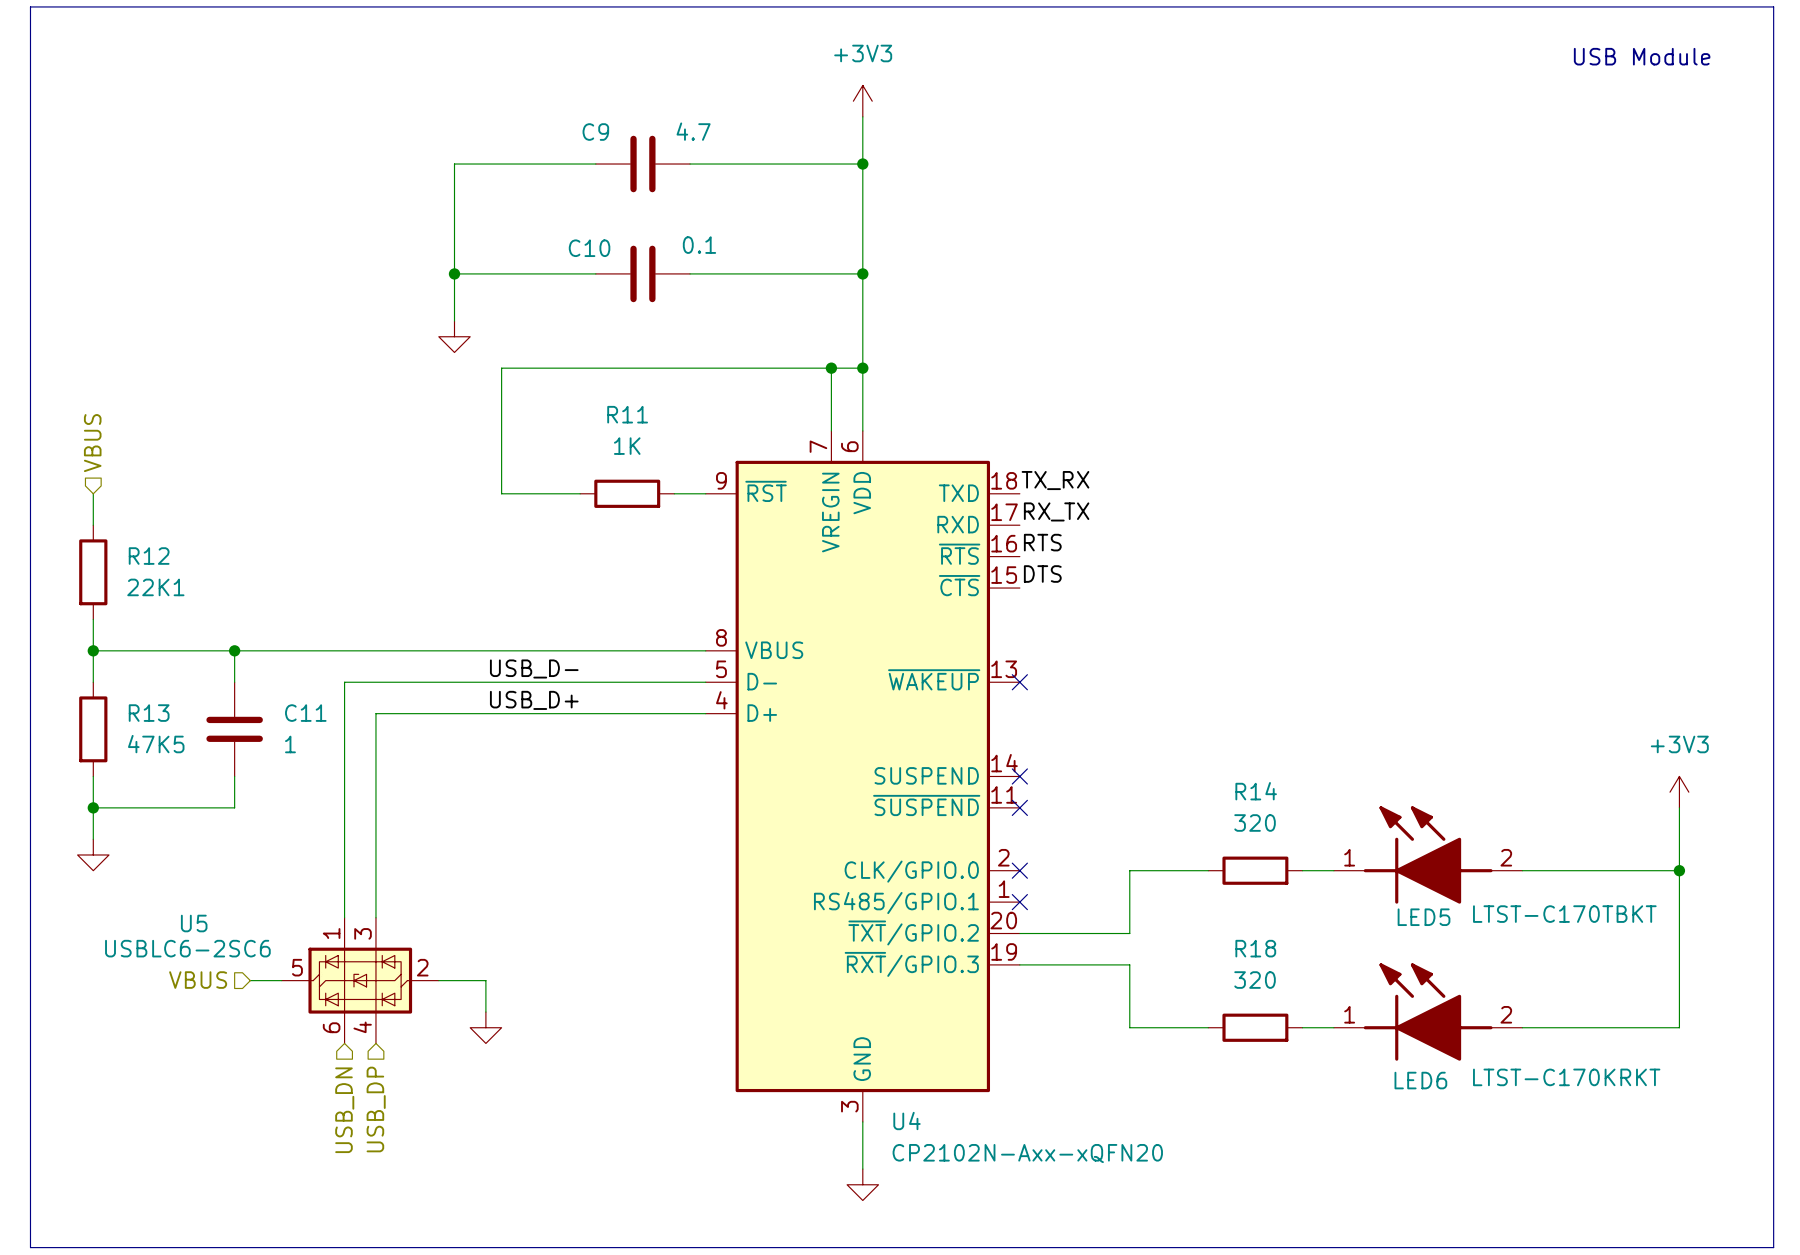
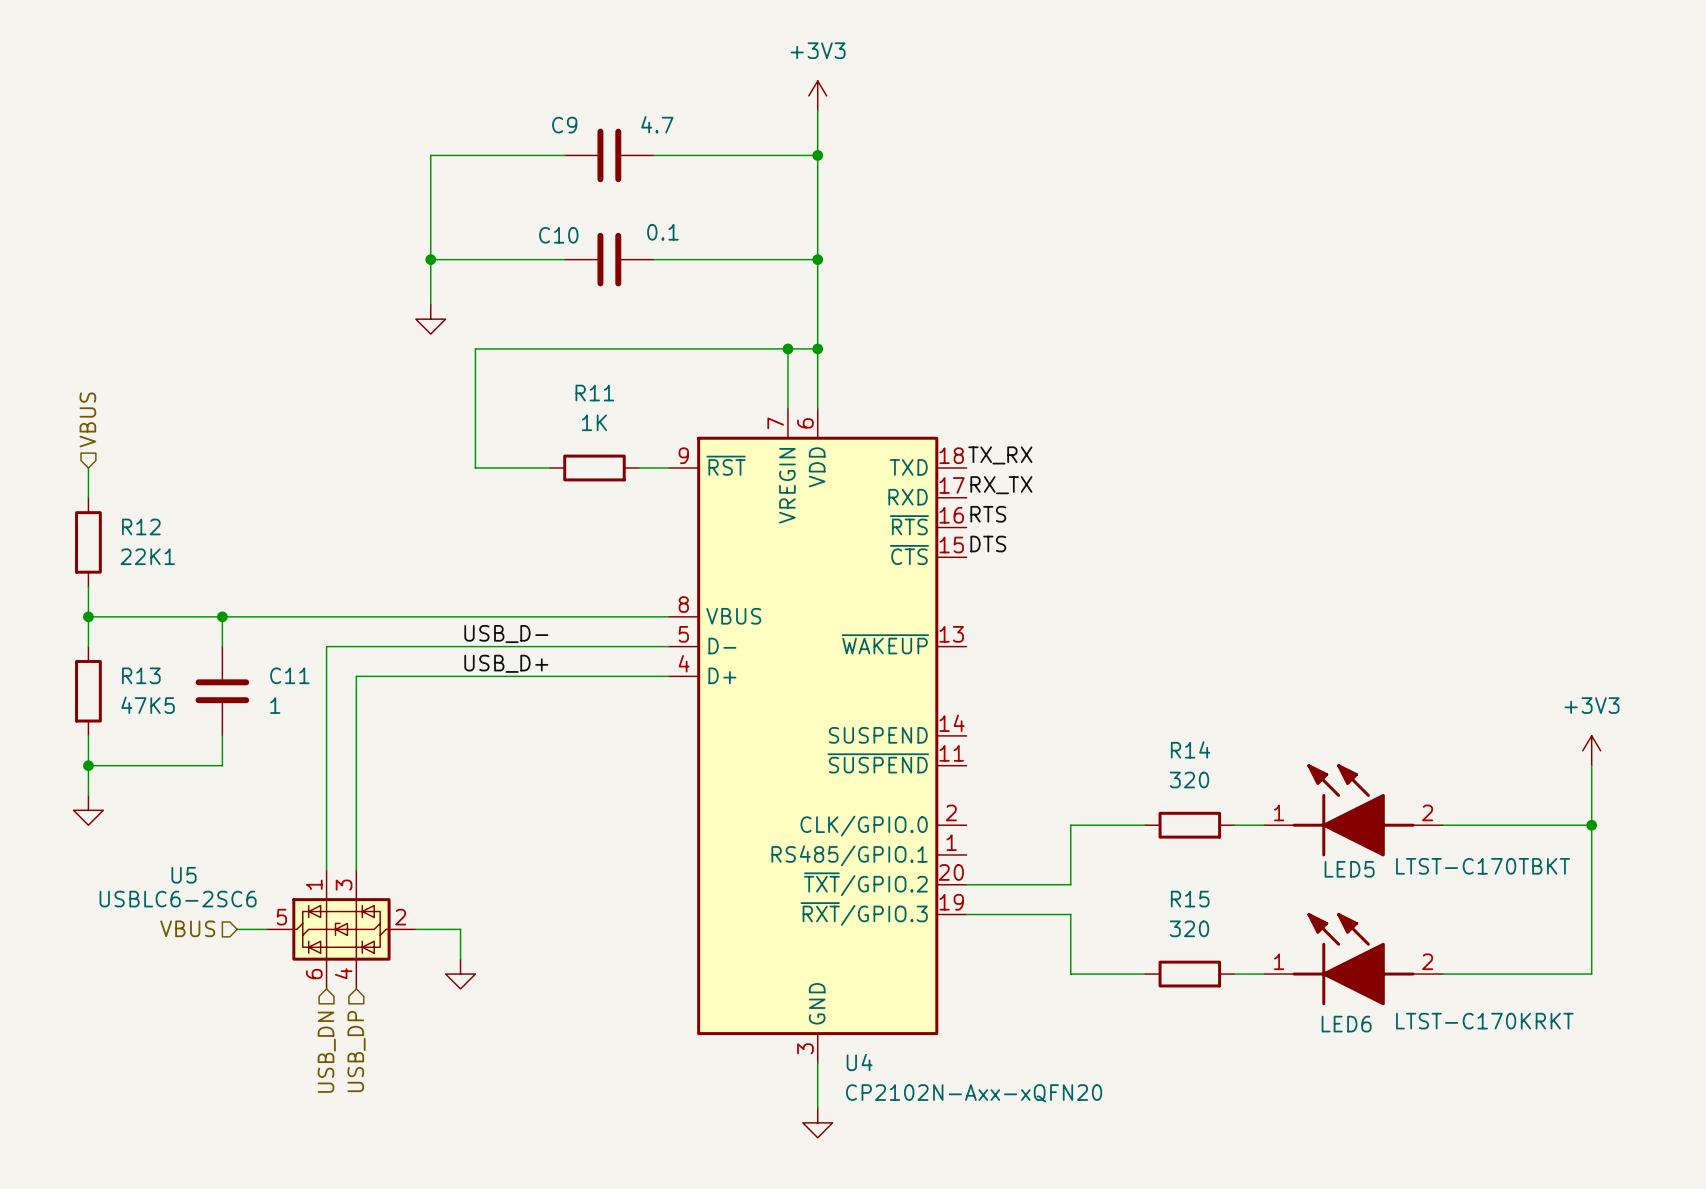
line: (30, 6) (1773, 6) (1773, 1247) (30, 1247) (30, 6) -> none
text: USB Module (1642, 56) -> none
no-connect mark: (1019, 682) -> none
no-connect mark: (1019, 776) -> none
no-connect mark: (1019, 807) -> none
no-connect mark: (1019, 870) -> none
no-connect mark: (1019, 902) -> none
R18 name: R18 (1255, 948) -> R15 (1190, 899)

